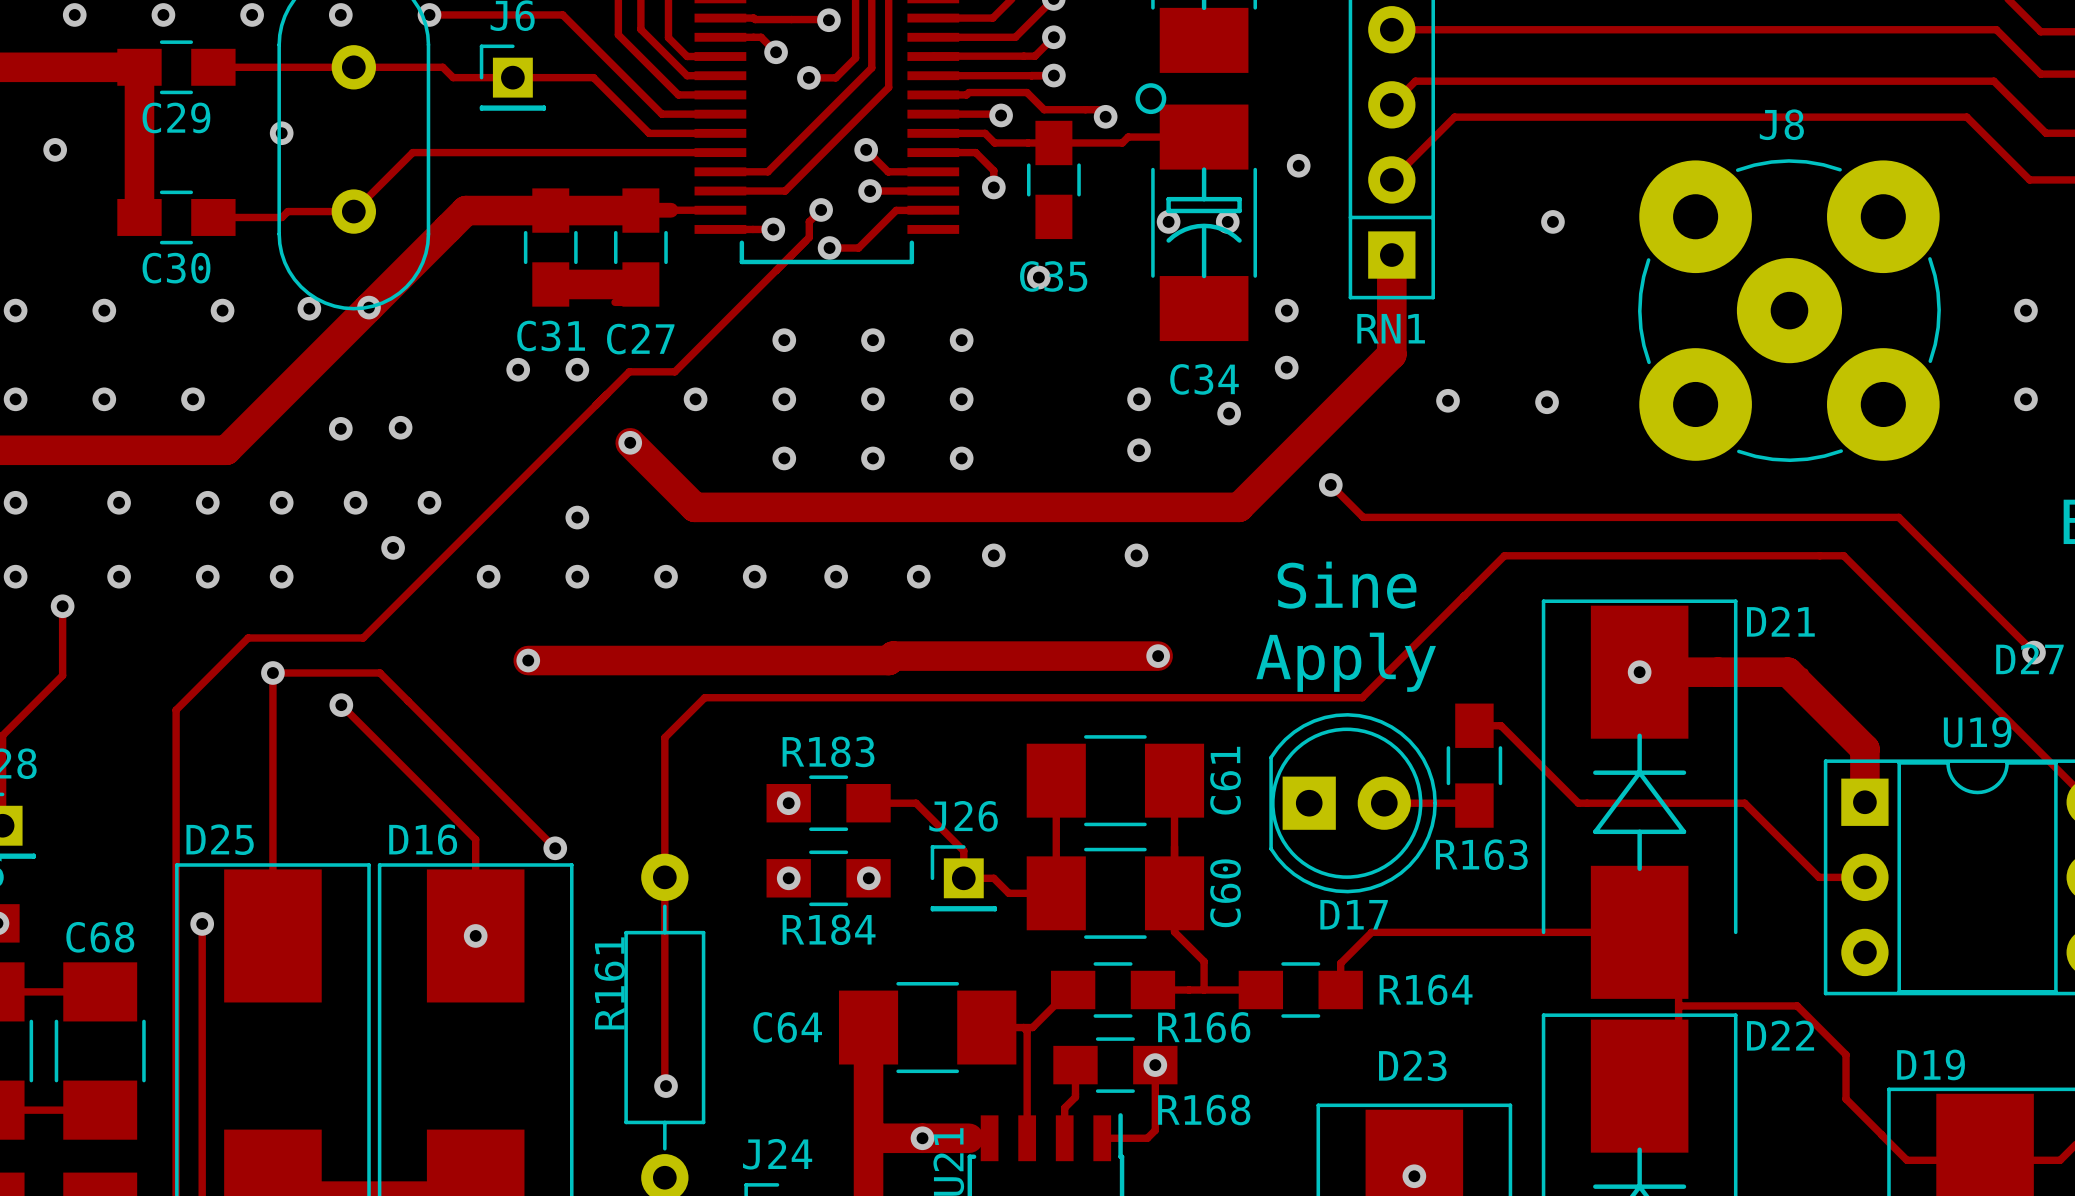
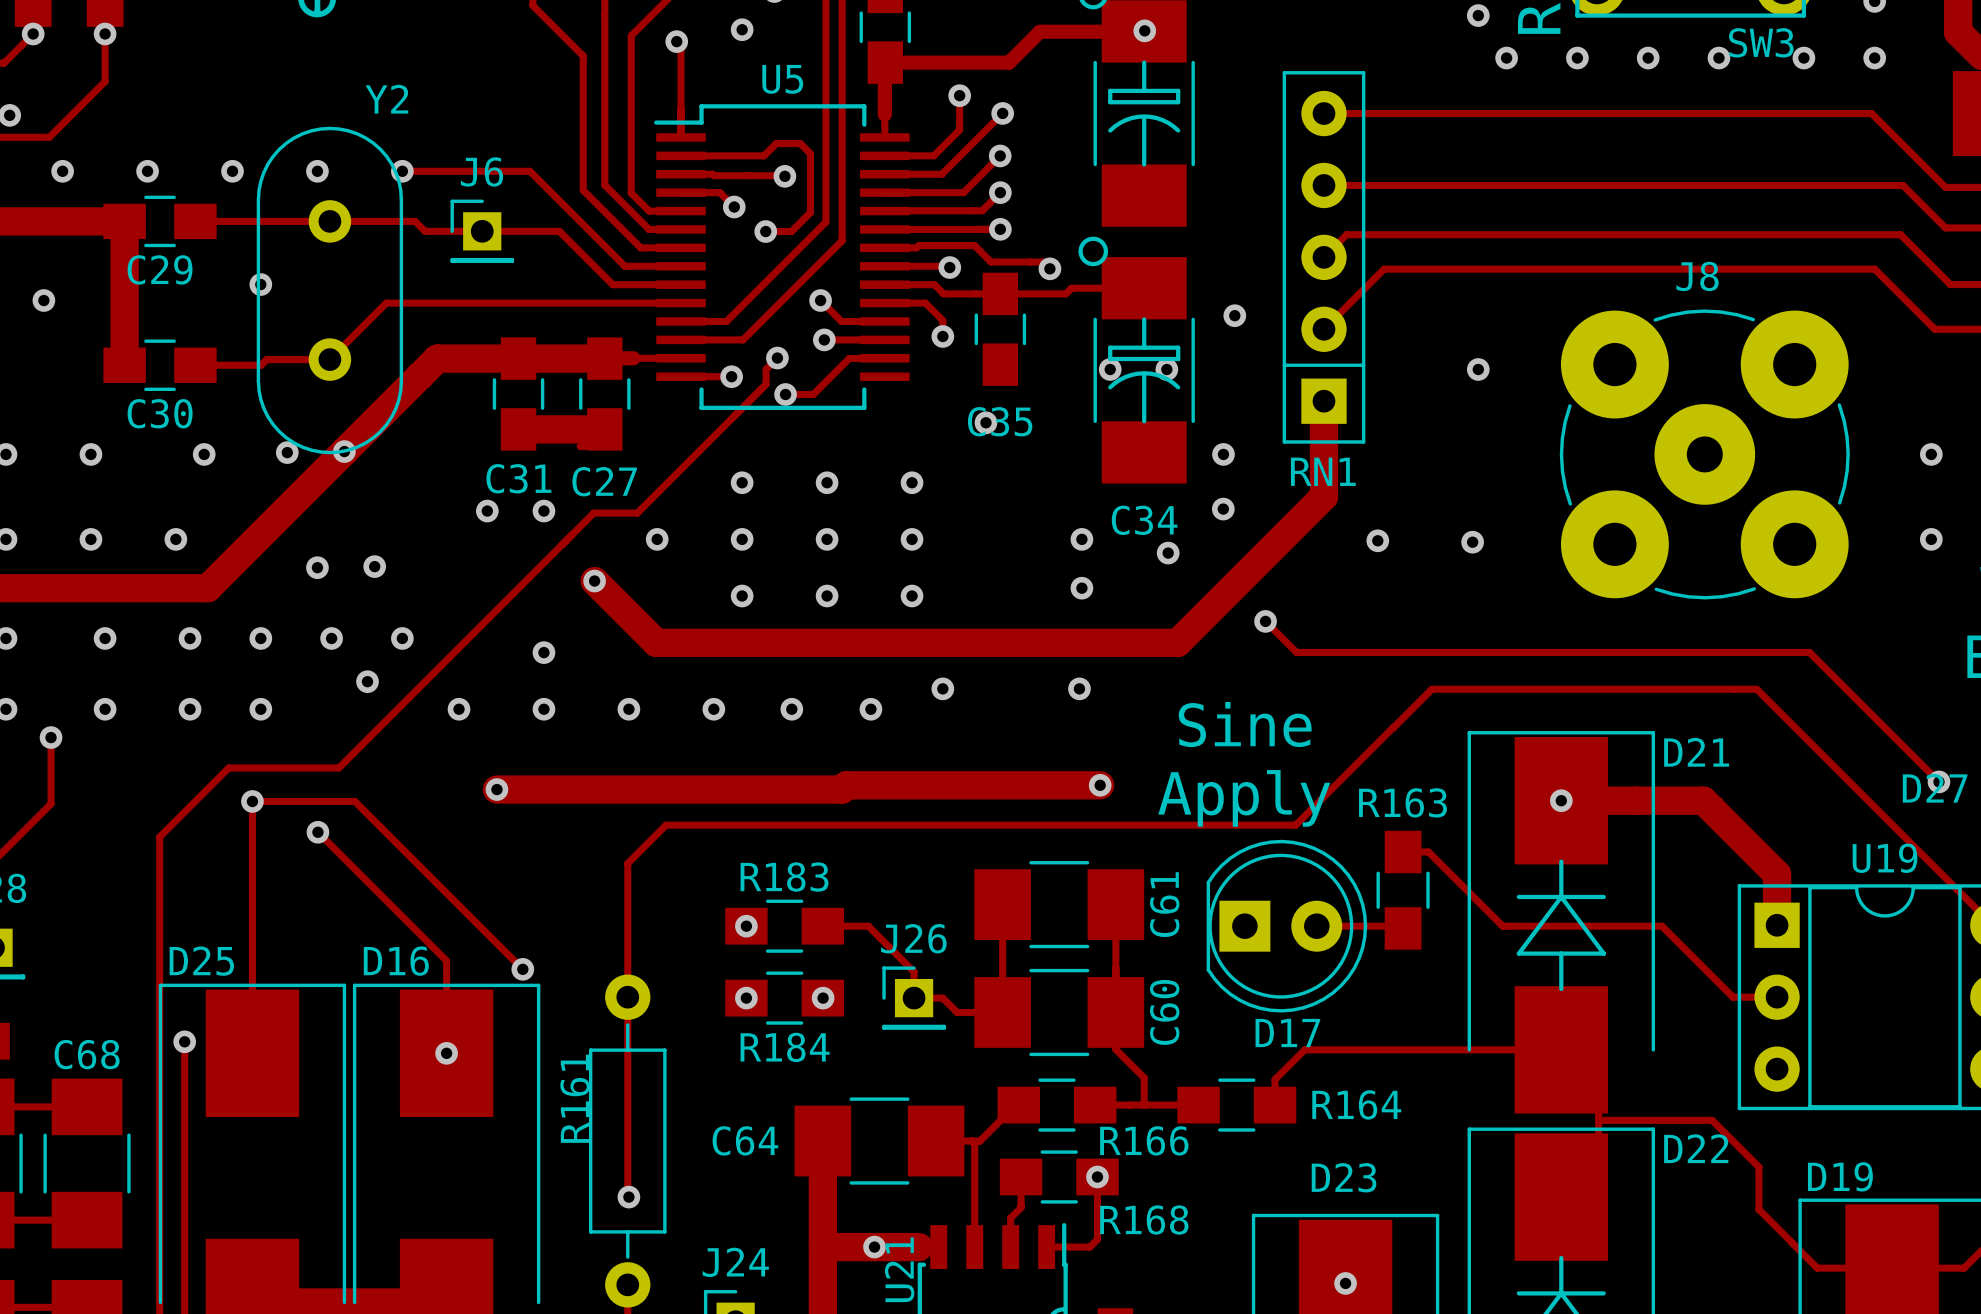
text position: Sine (1347, 585) -> Sine (1245, 724)
text position: Apply (1346, 662) -> Apply (1244, 798)
R163 name position: R163 (1481, 854) -> R163 (1402, 802)

